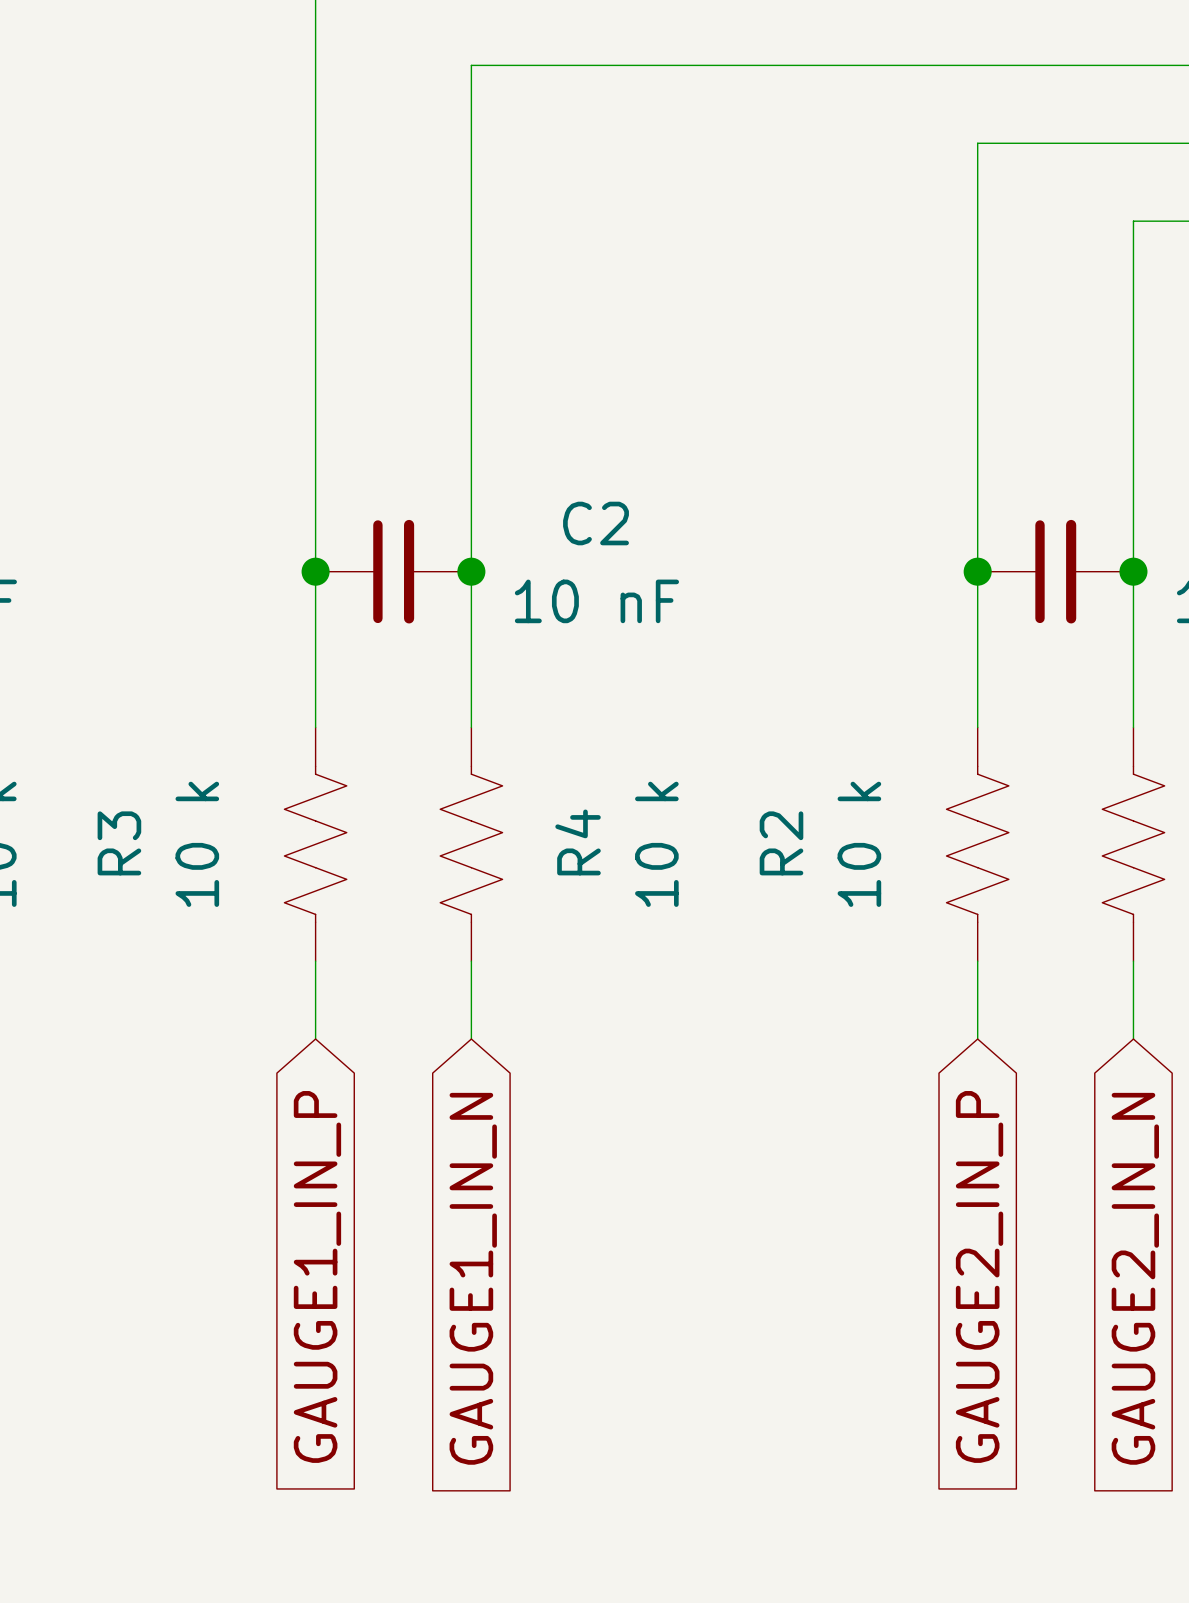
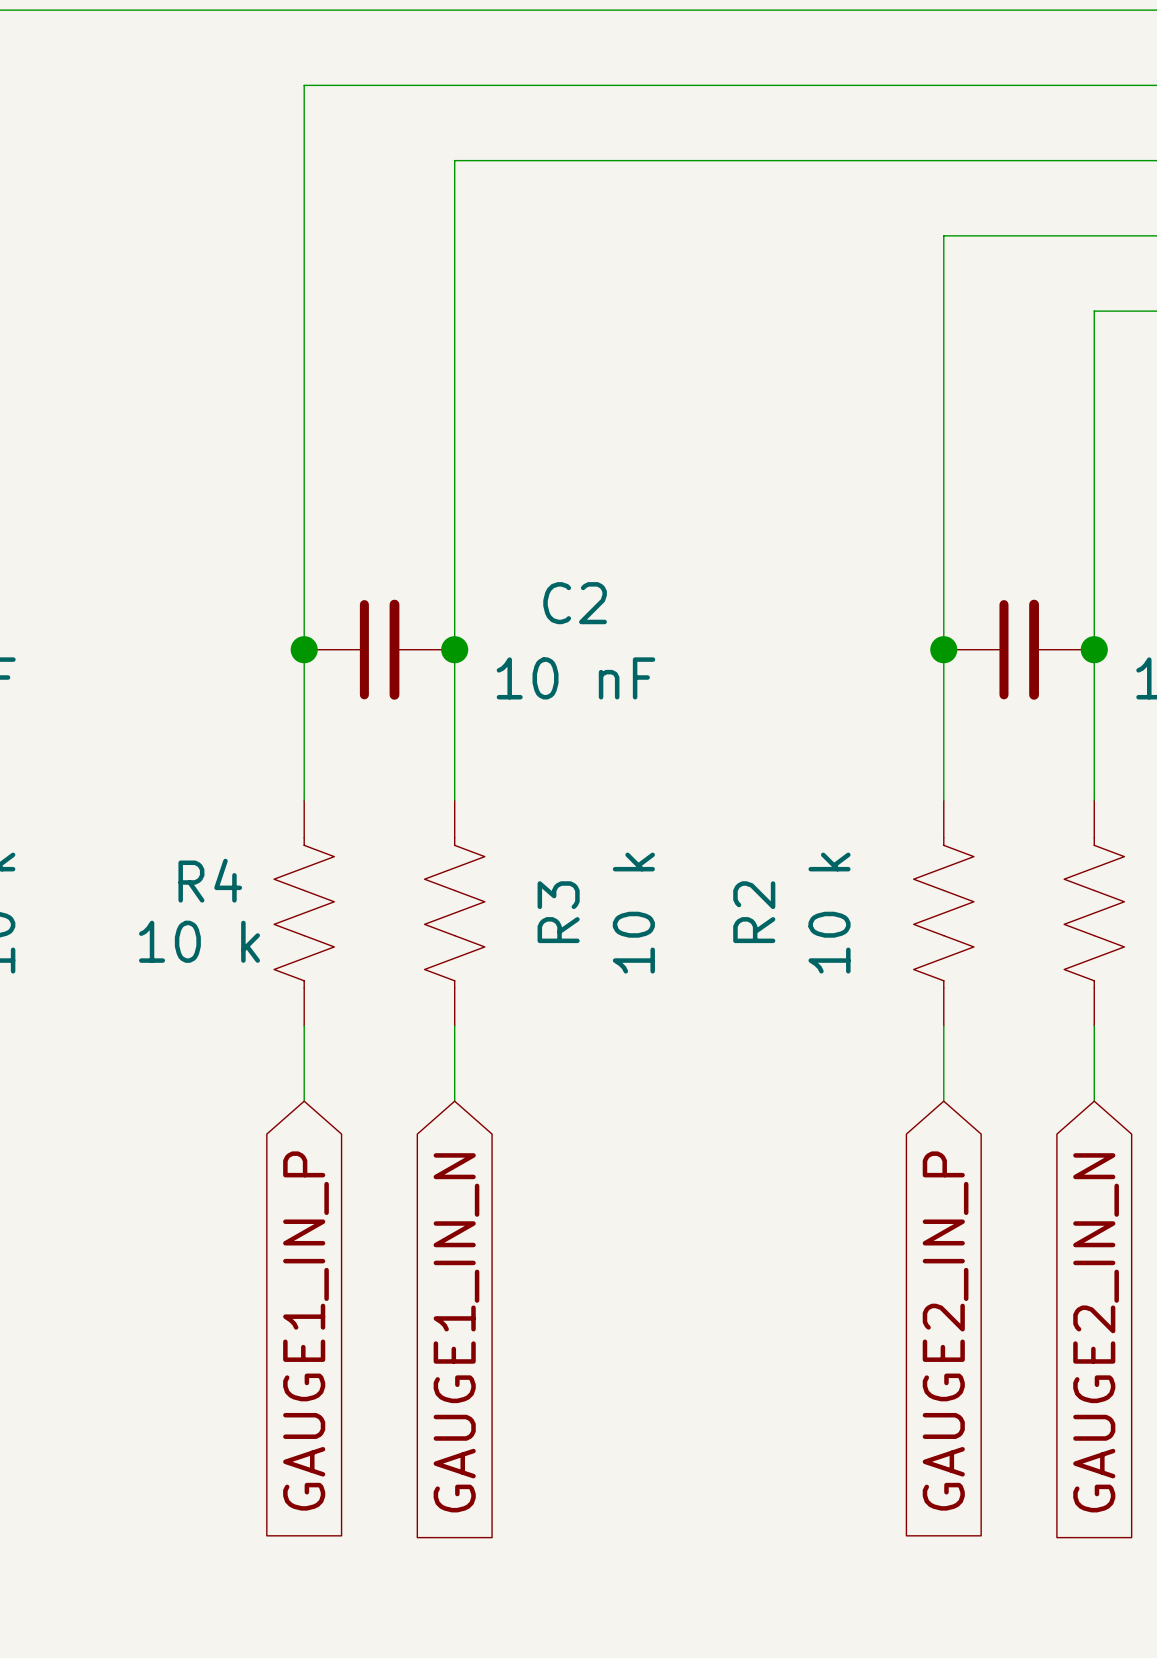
R4 name: R4 (578, 842) -> R3 (558, 912)
R3 name: R3 (119, 843) -> R4 (210, 880)
R3 value rotation: 0° (197, 844) -> 90° clockwise (199, 941)

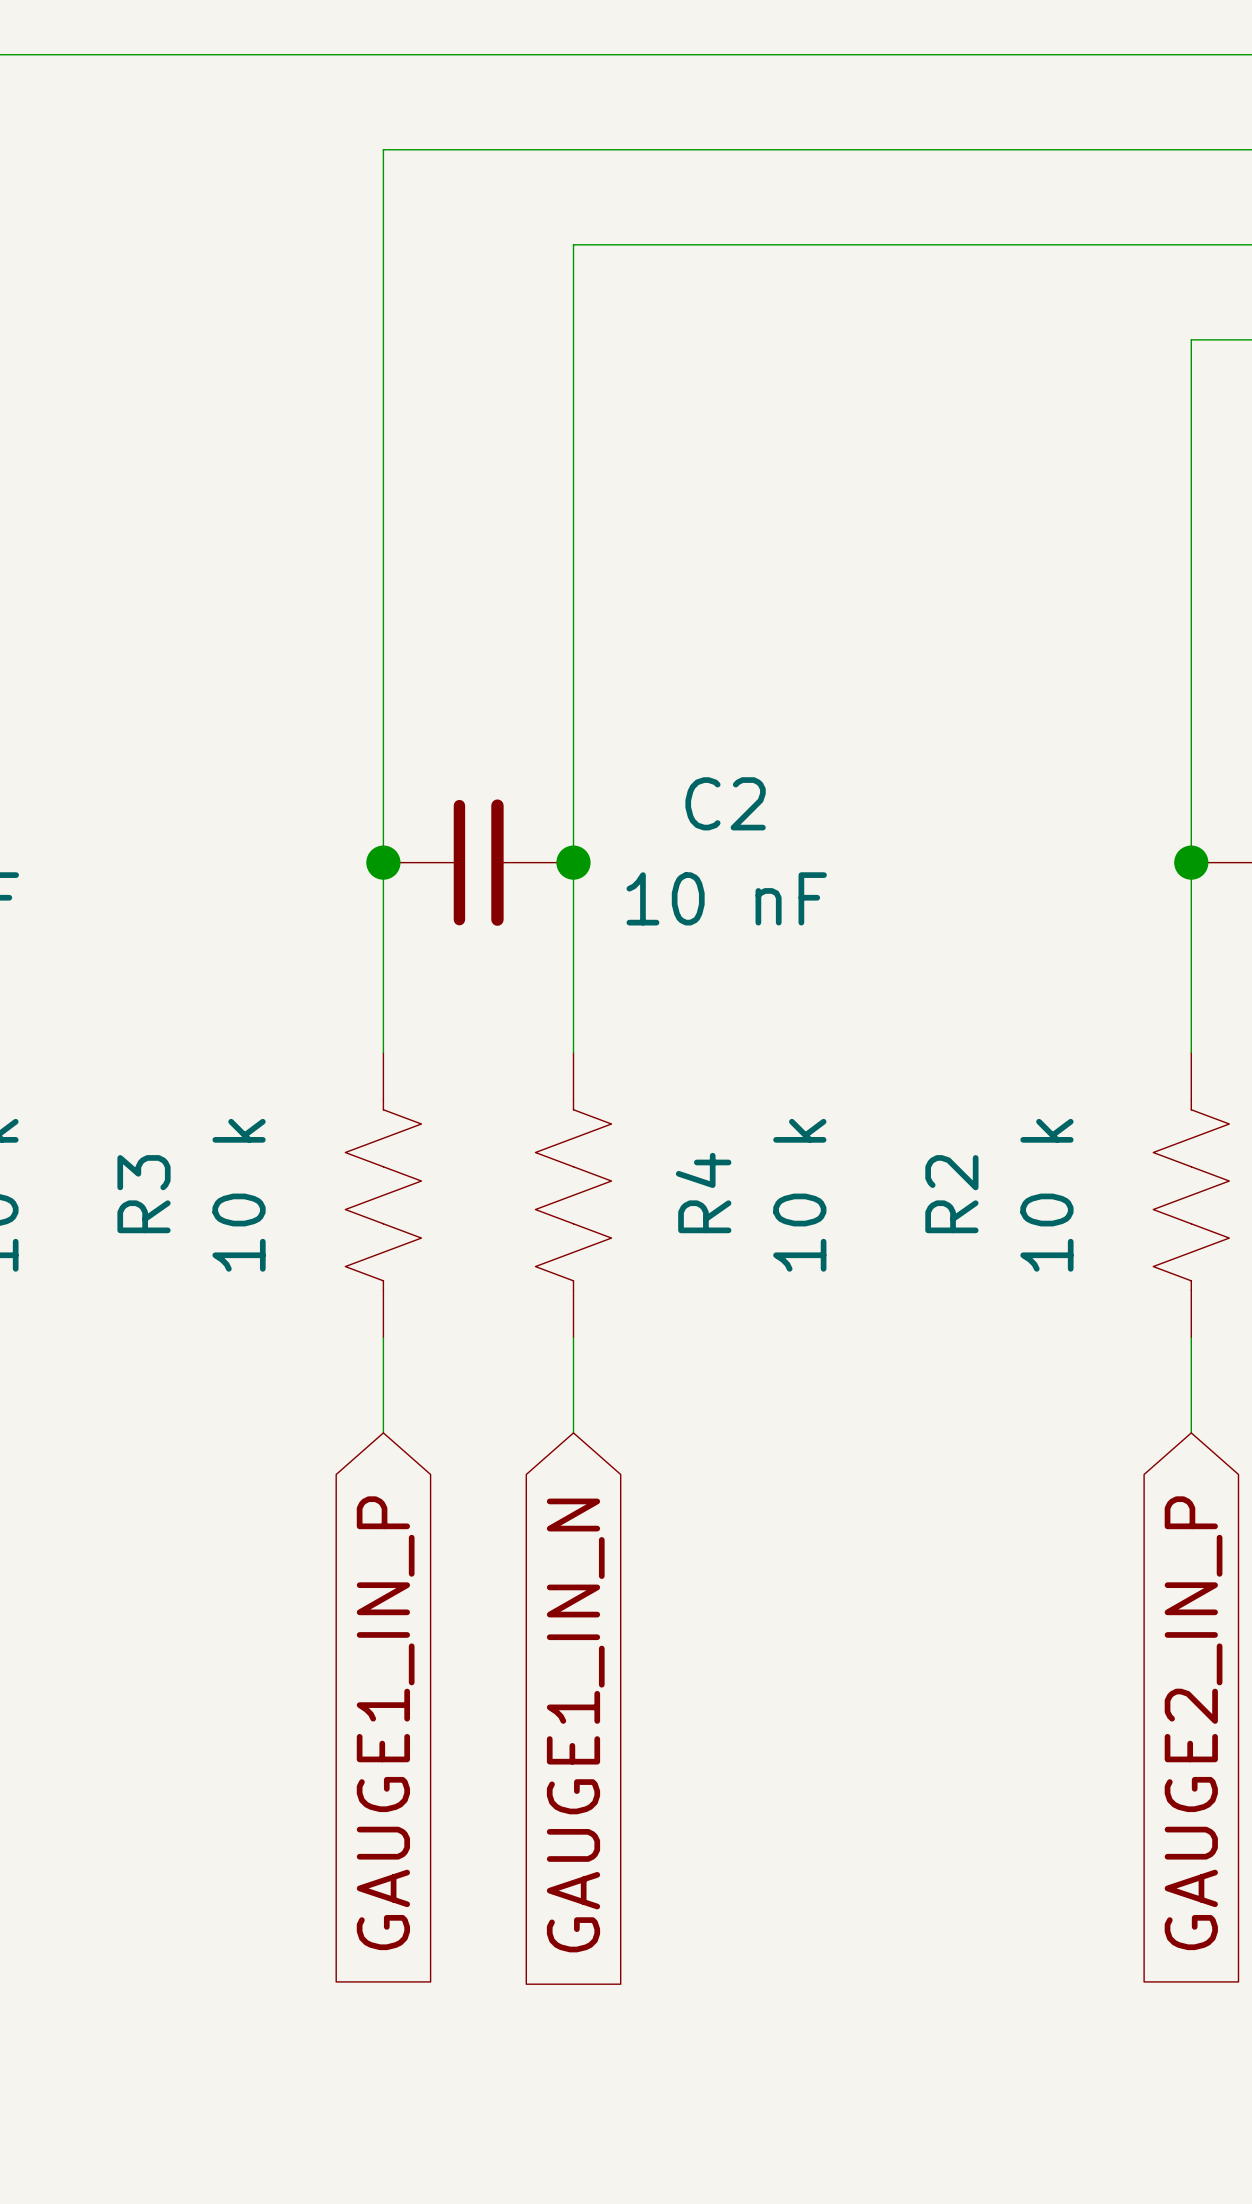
R4 name: R4 (210, 880) -> R3 (144, 1194)
R3 name: R3 (558, 912) -> R4 (703, 1193)
R4 value rotation: 0° (199, 941) -> 90° counterclockwise (239, 1195)

